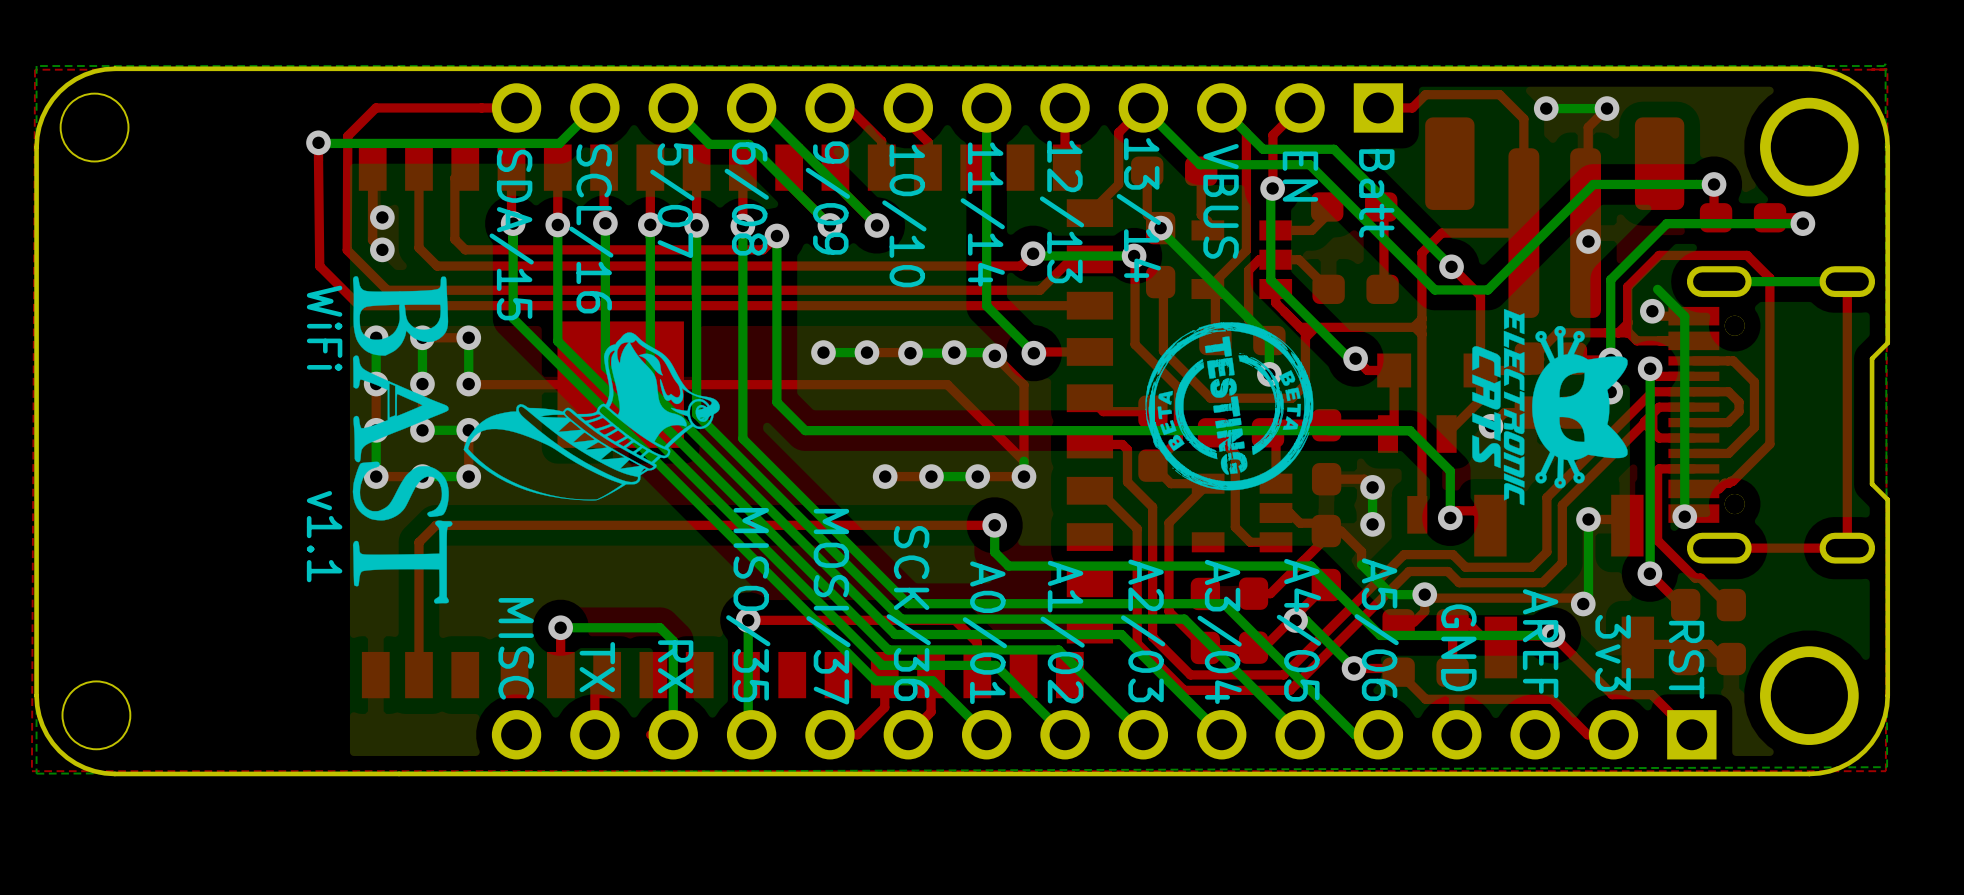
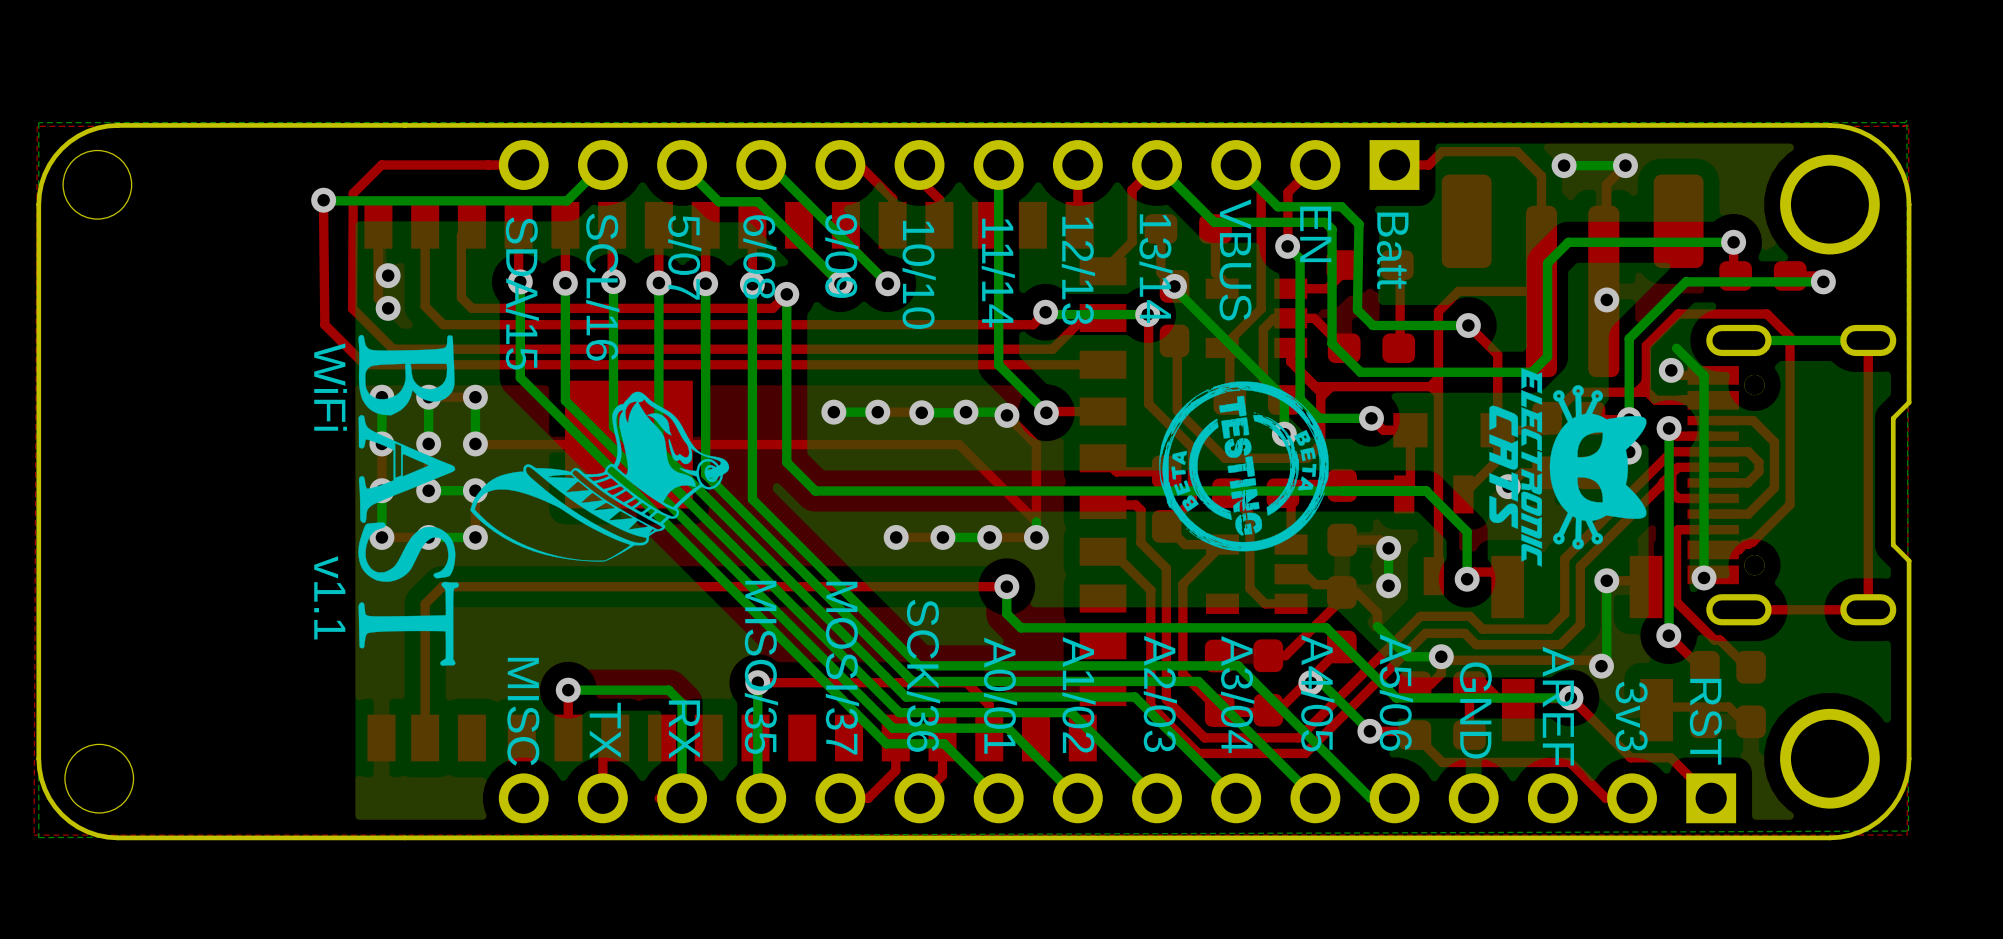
bottom track: (1325, 149) (1334, 149) (1451, 266) -> (1341, 206) (1359, 224) (1357, 309) (1373, 325) (1468, 325)
bottom track: (1316, 171) (1434, 289) (1487, 289) (1593, 184) -> (1332, 229) (1332, 343) (1360, 372) (1531, 372) (1547, 356) (1547, 263) (1568, 242) (1611, 242)
bottom track: (1272, 188) (1270, 190) (1270, 280) (1349, 358) -> (1287, 246) (1300, 258) (1300, 398)
bottom track: none -> (1299, 398) (1319, 418) (1365, 418)

